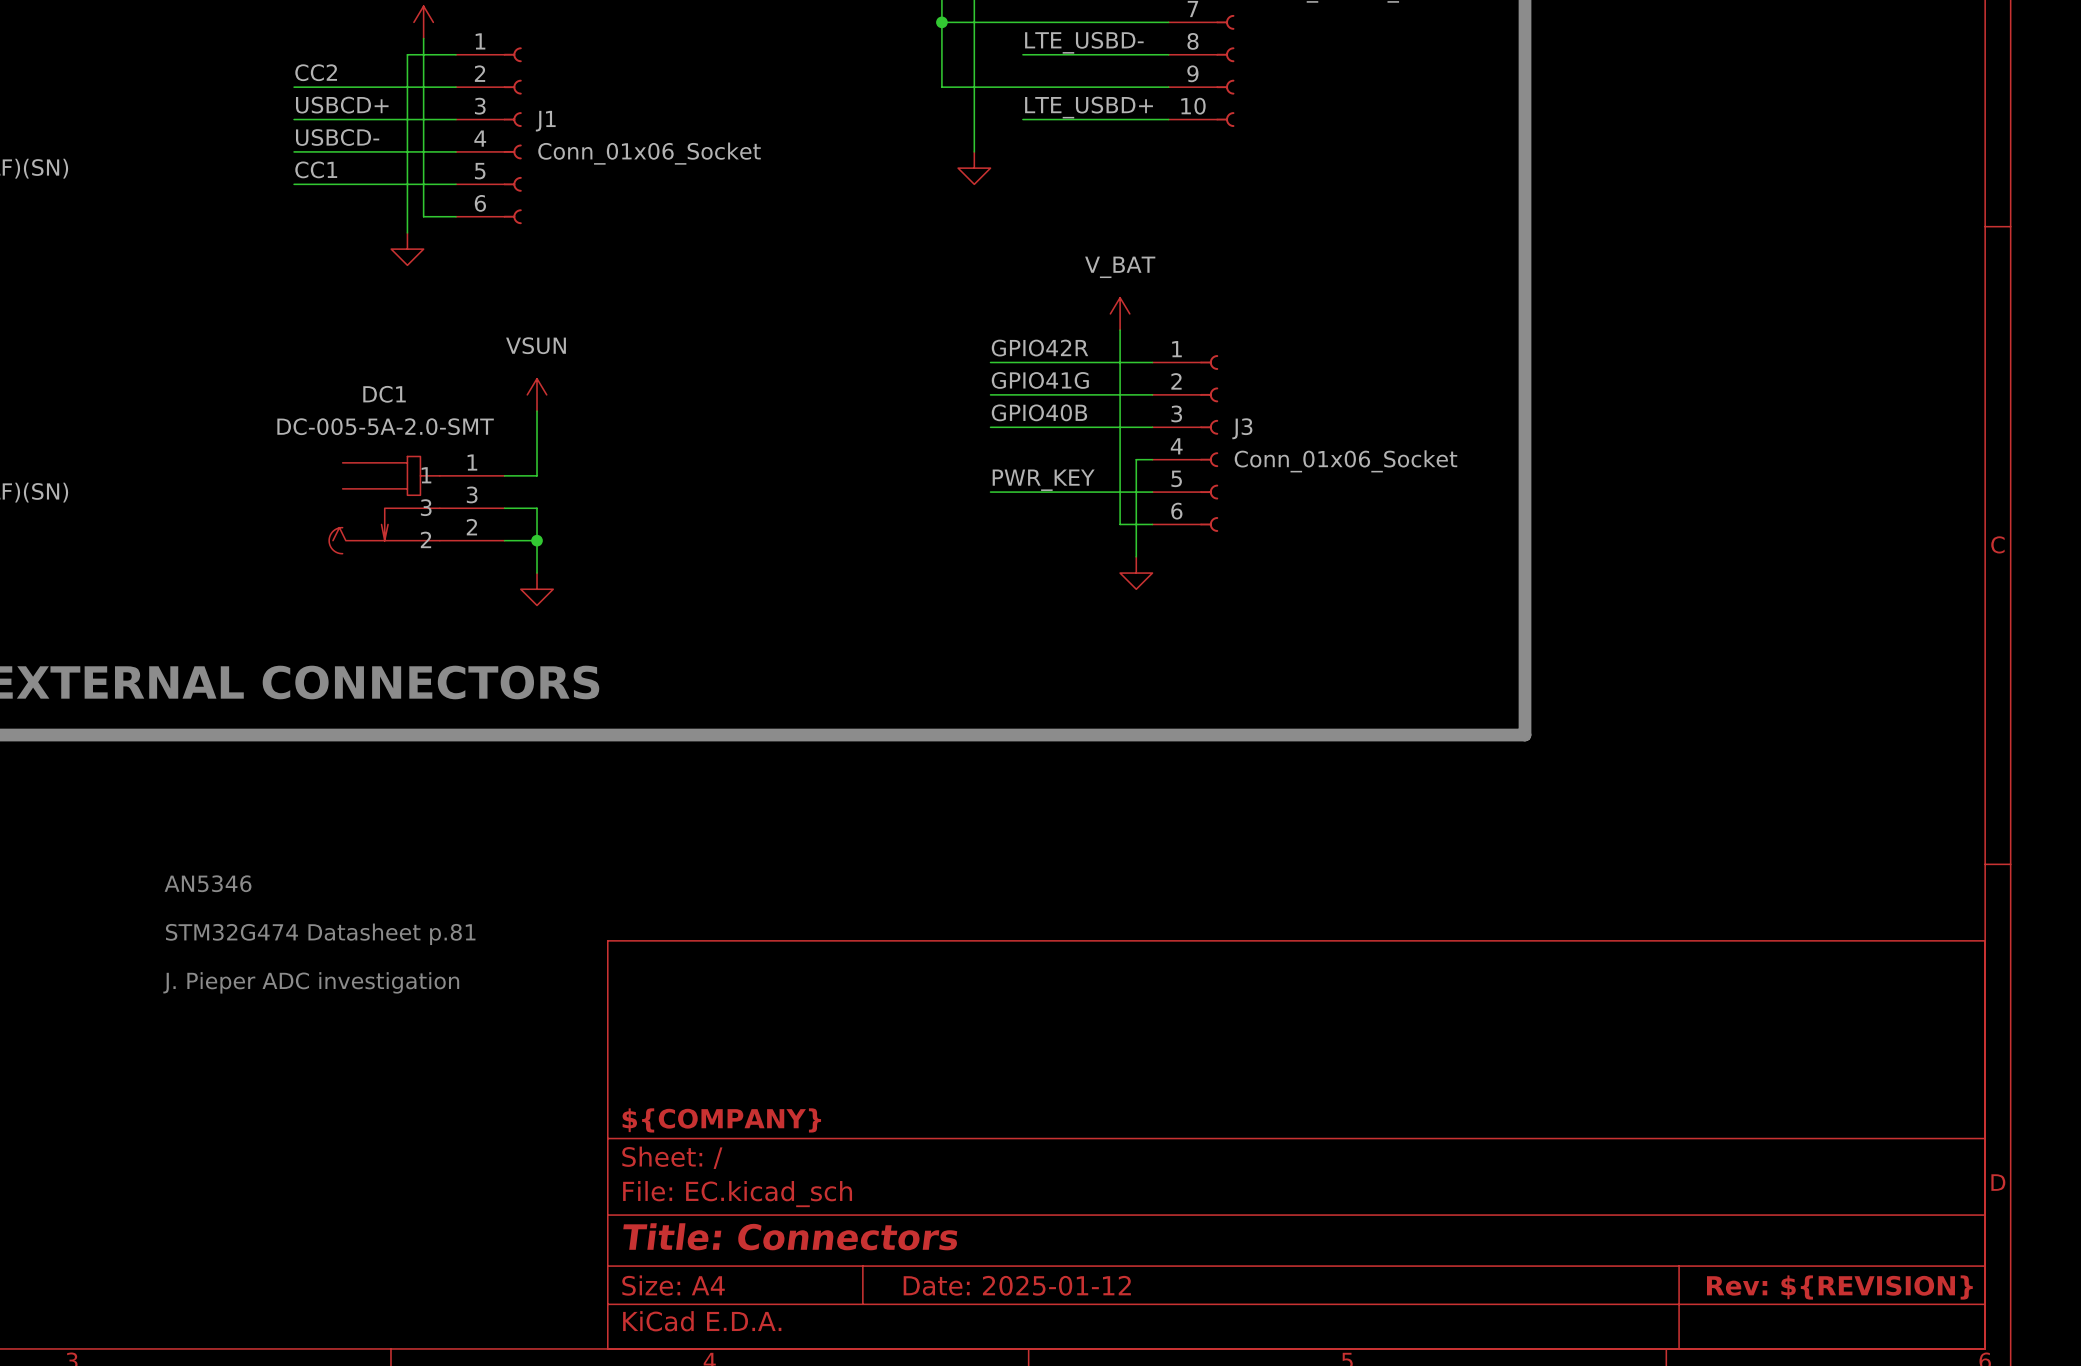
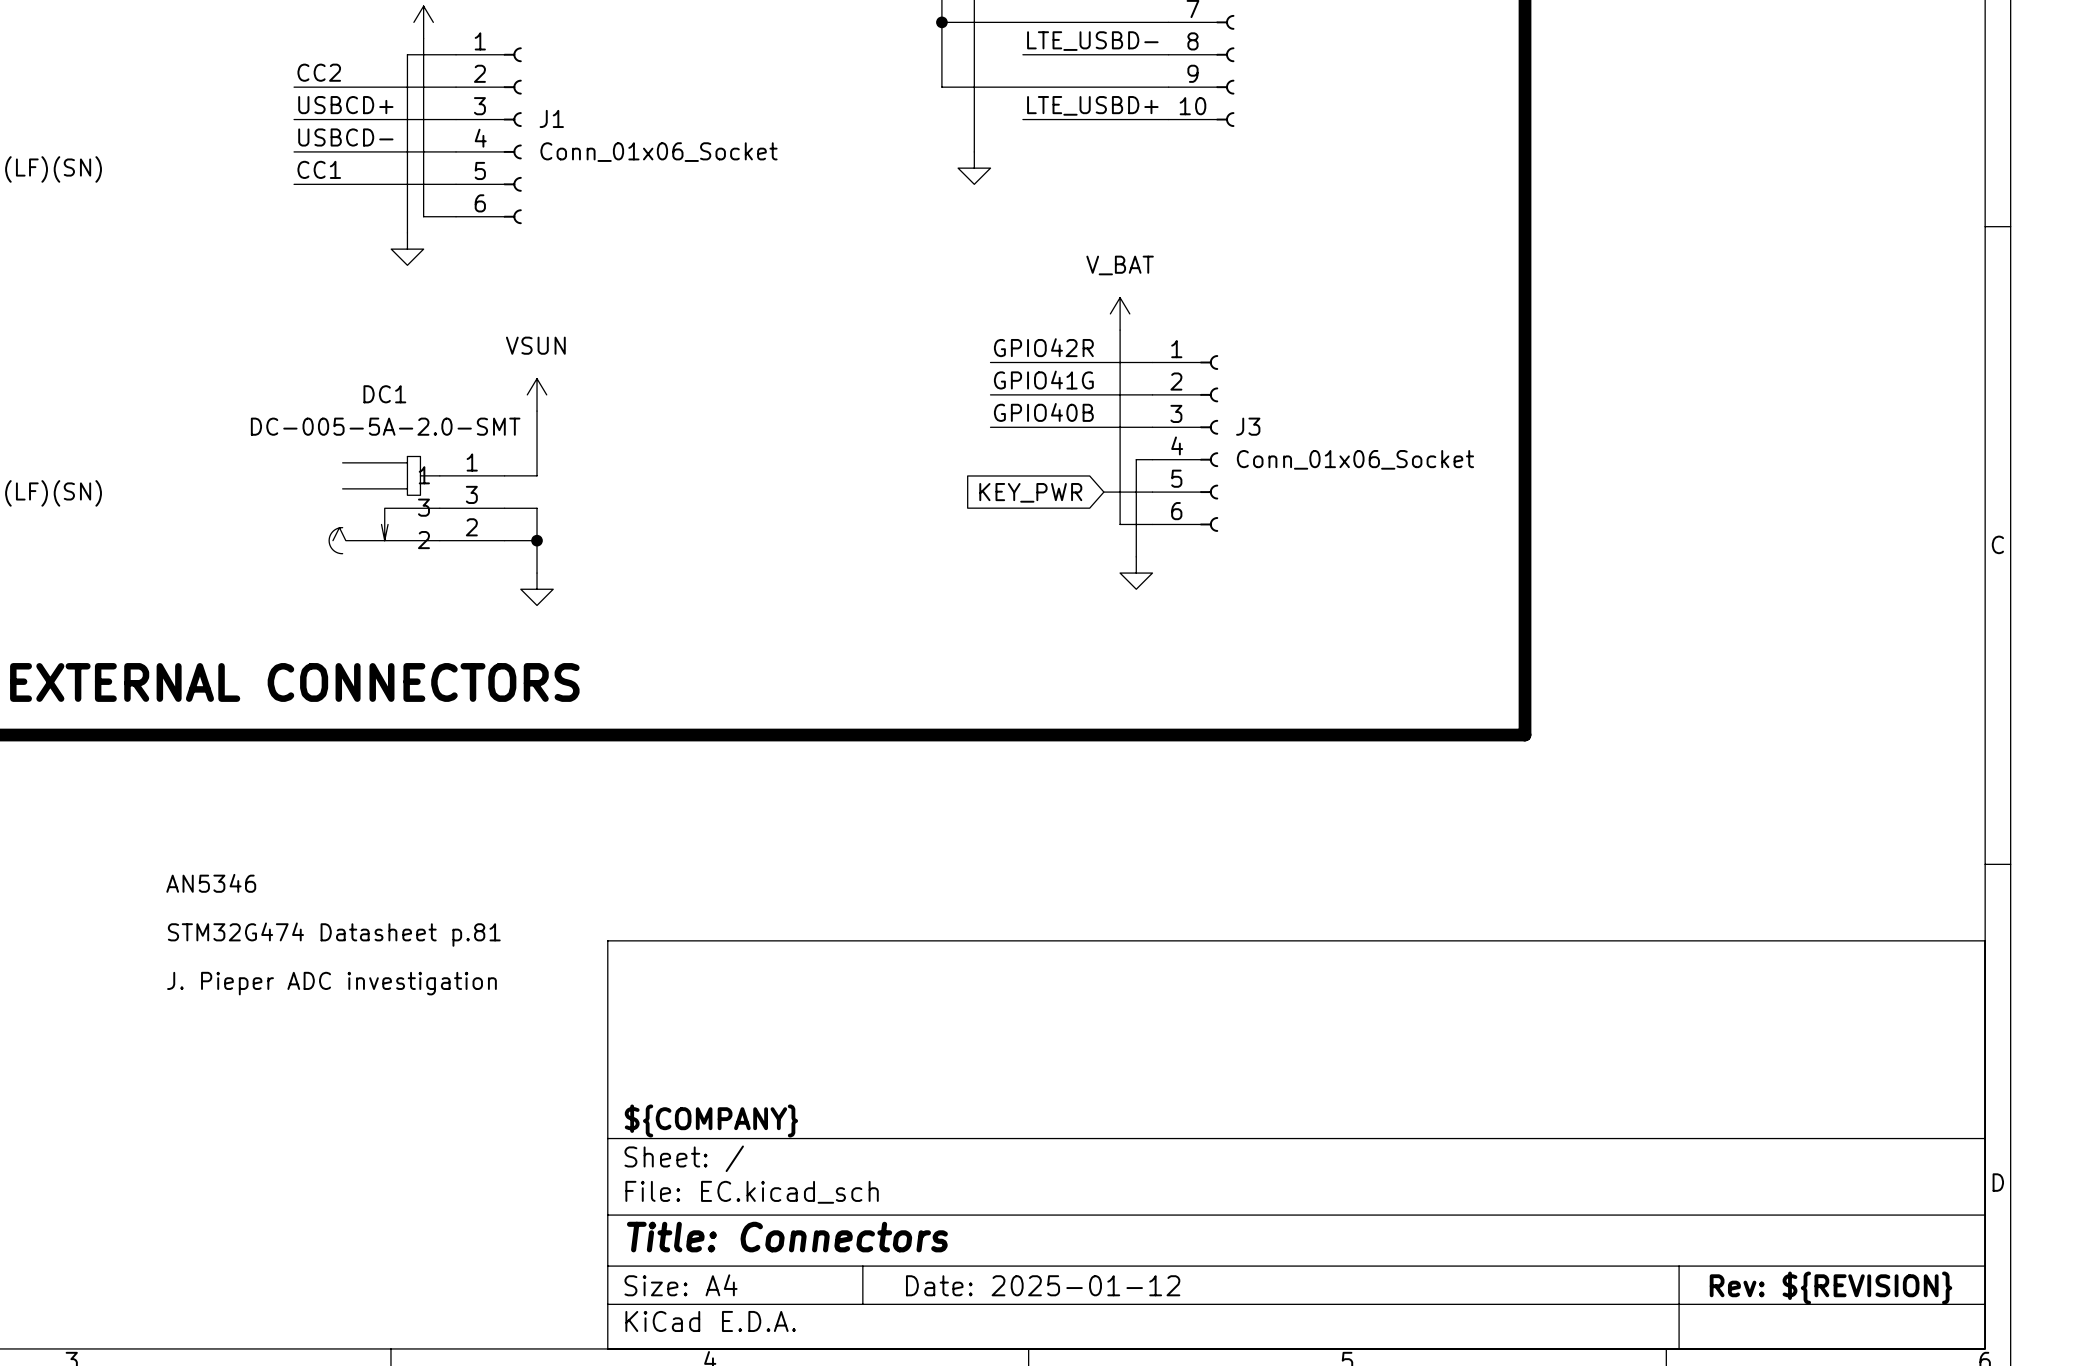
label: PWR_KEY (1043, 480) -> none
wire: (990, 492) (1103, 492) -> none
global label: none -> KEY_PWR (1030, 492)

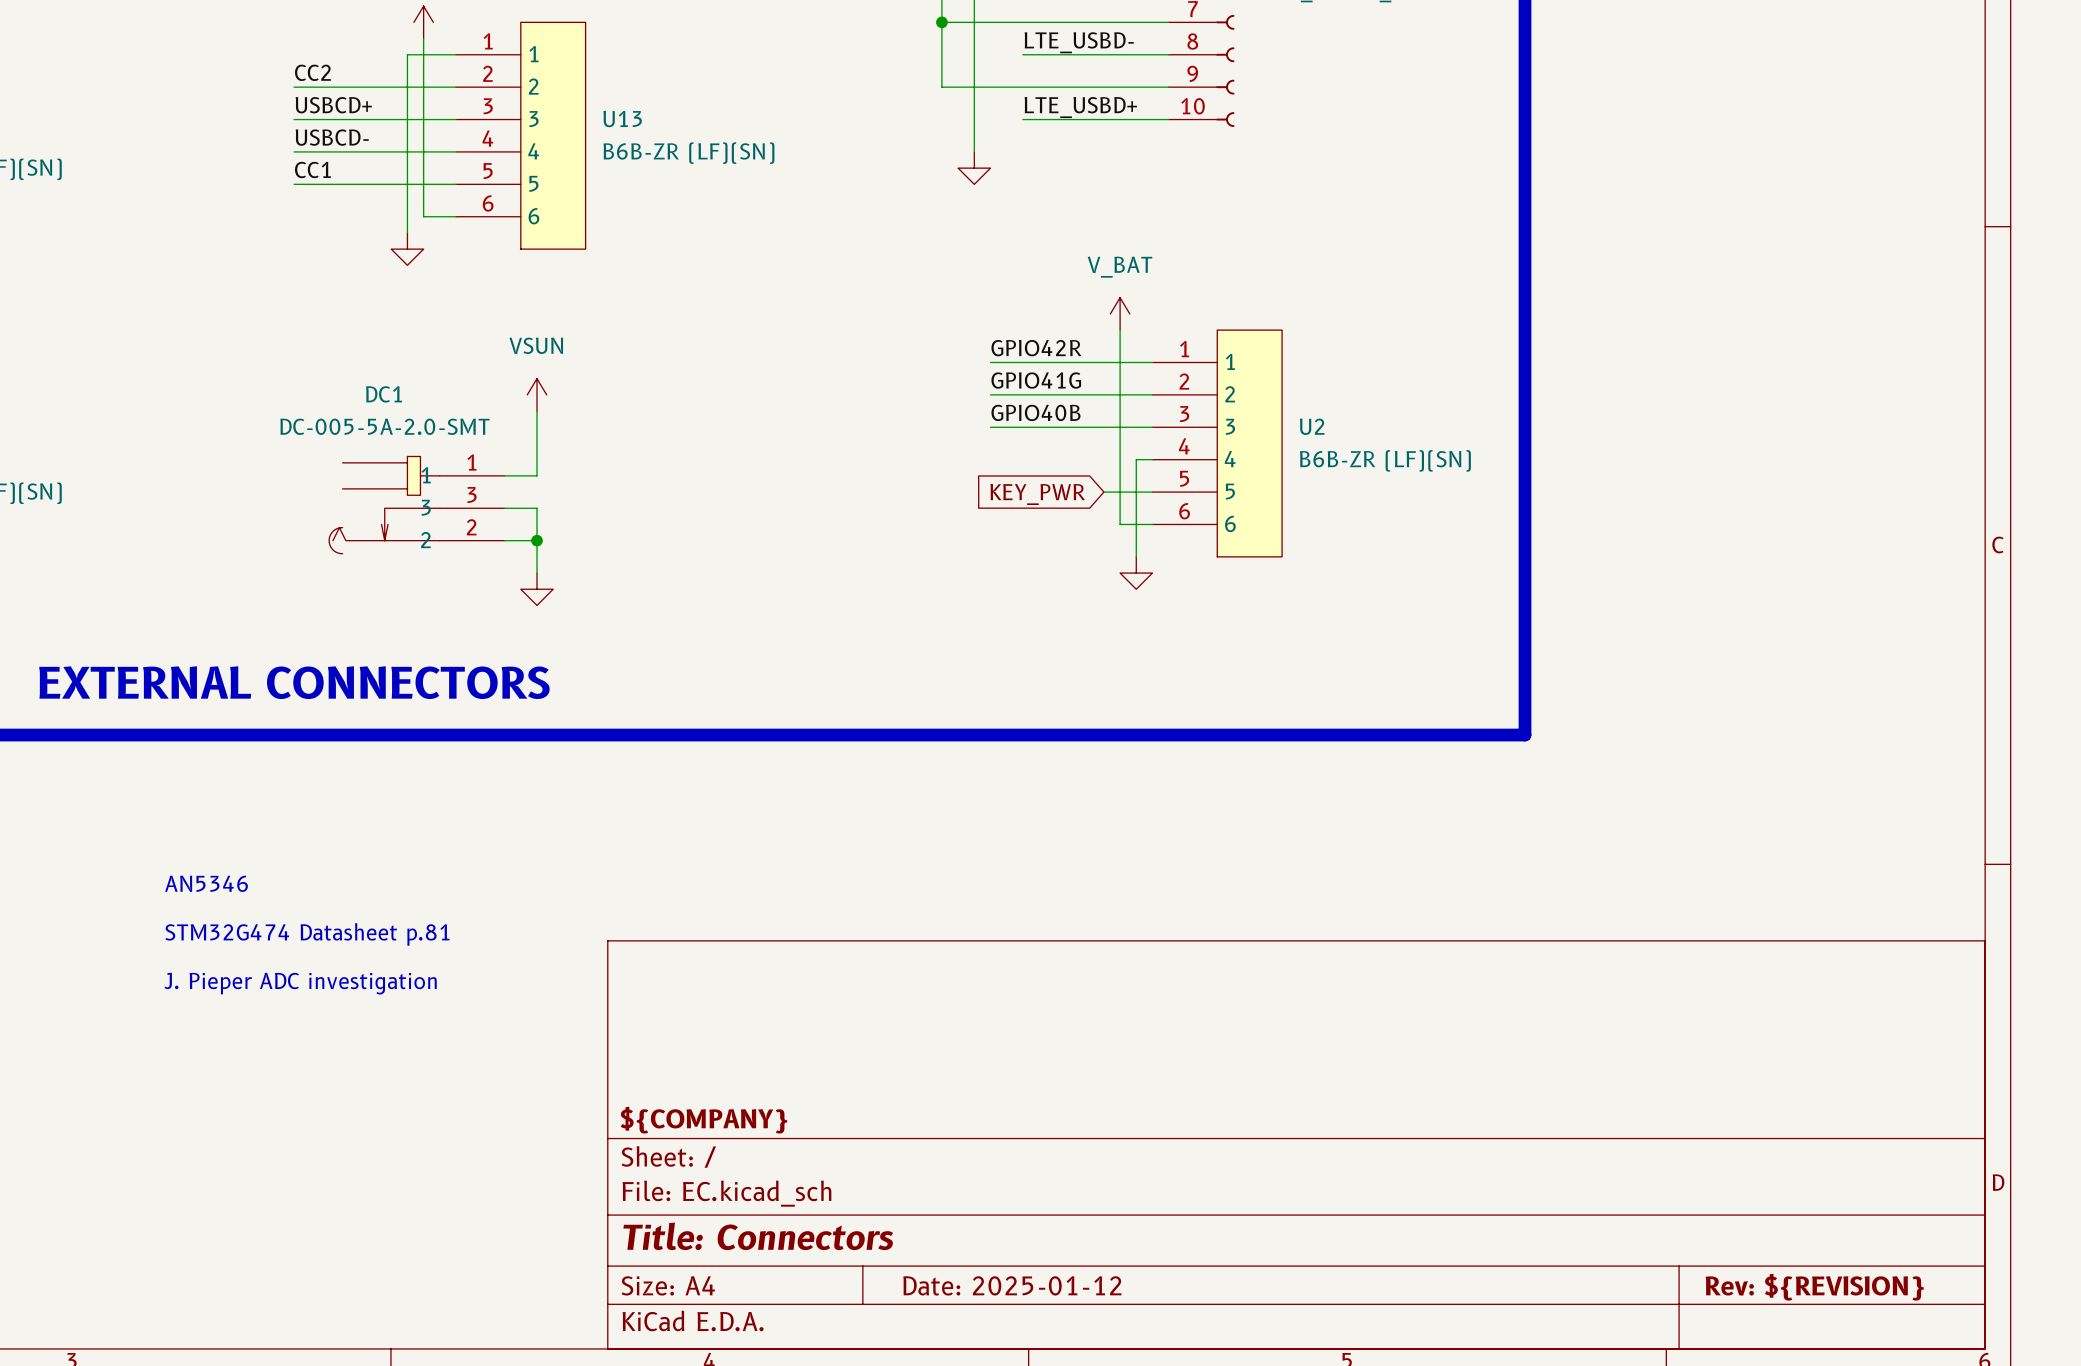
J1: Conn_01x06_Socket (488, 135) -> none
U13: none -> B6B-ZR (LF)(SN) (520, 135)
J3: Conn_01x06_Socket (1185, 443) -> none
U2: none -> B6B-ZR (LF)(SN) (1217, 443)

